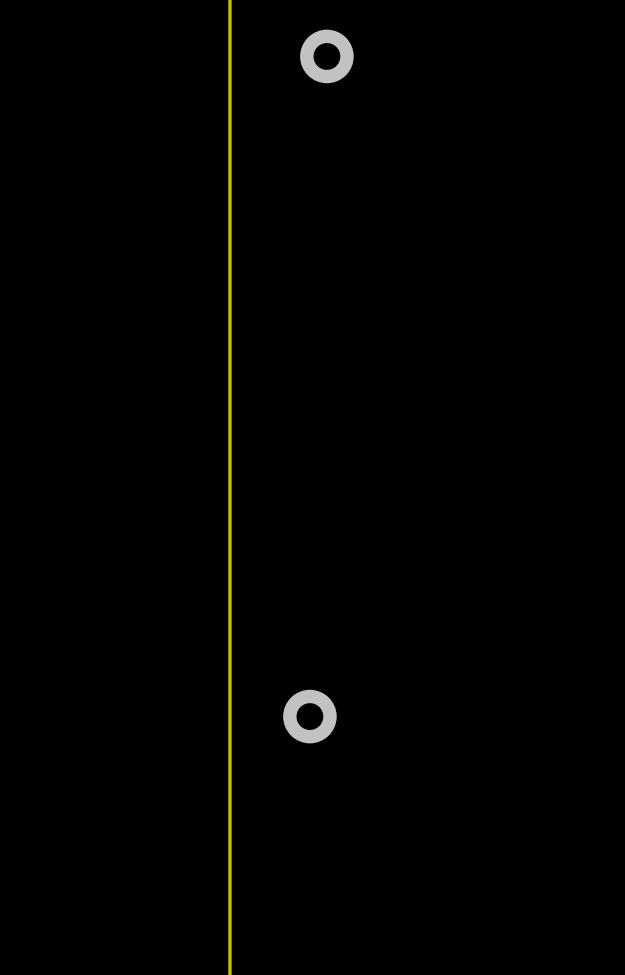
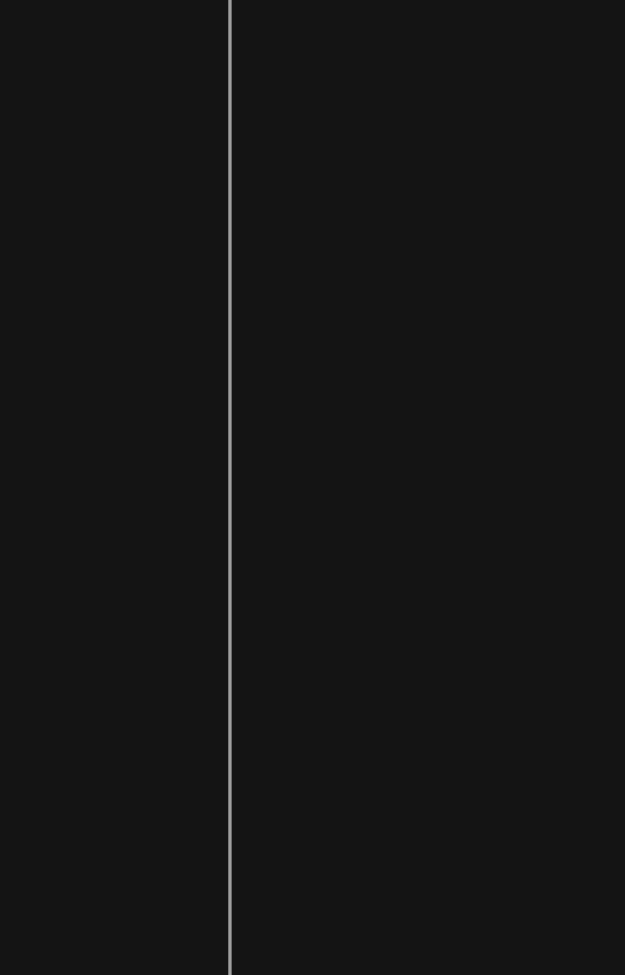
via: (326, 56) -> none
via: (309, 716) -> none

